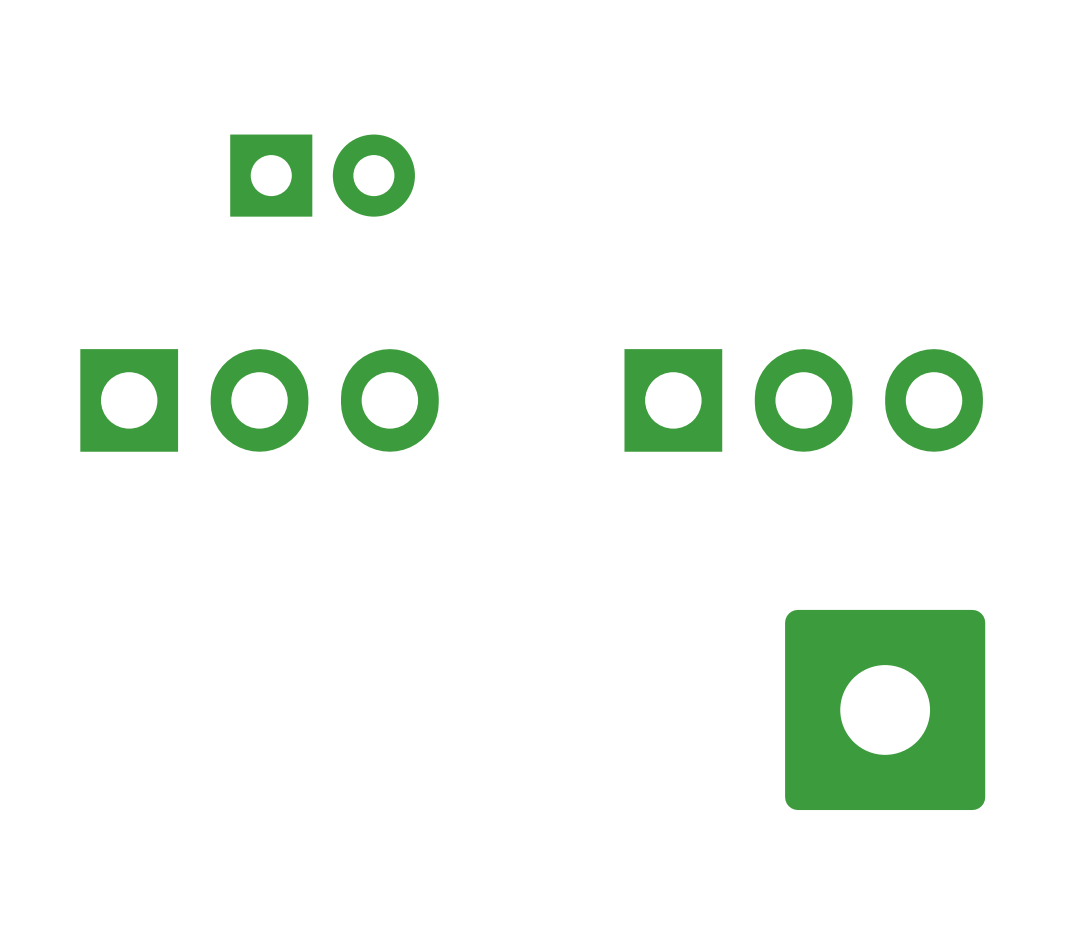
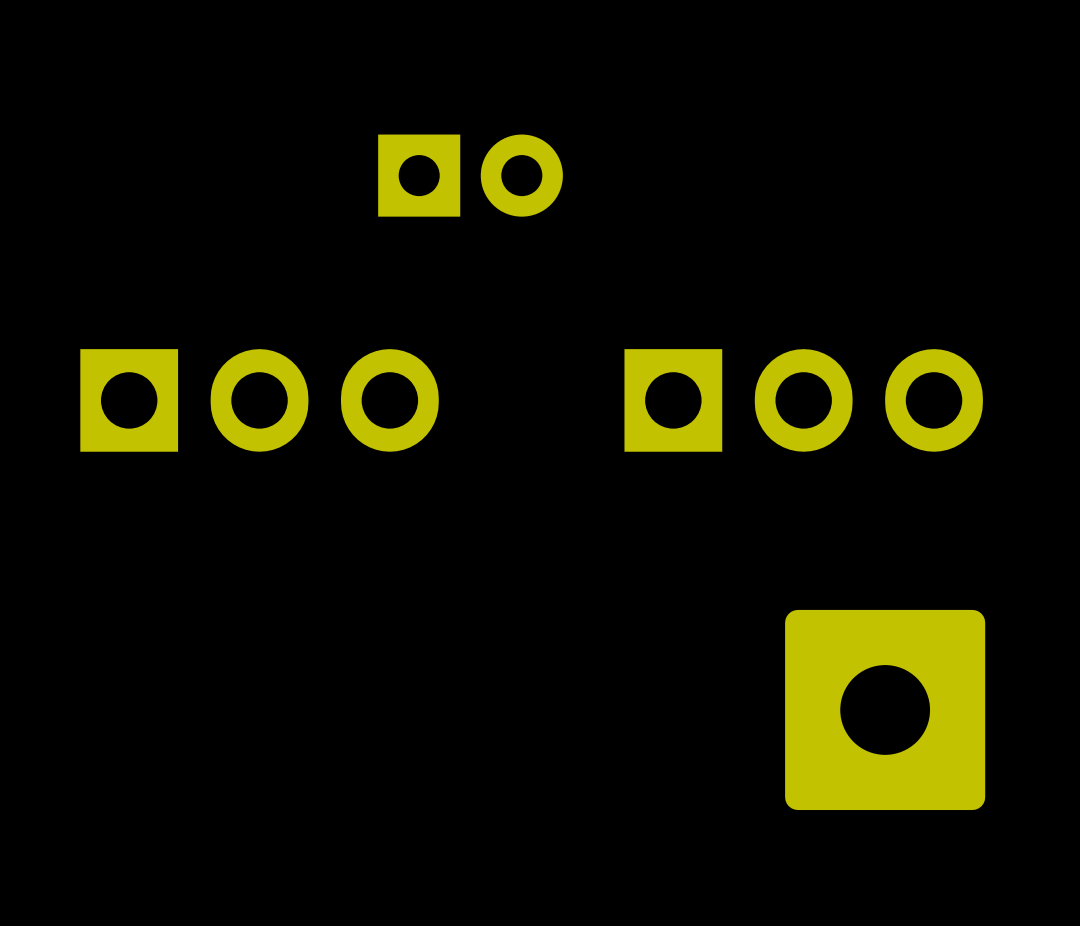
part position: (322, 175) -> (470, 175)

